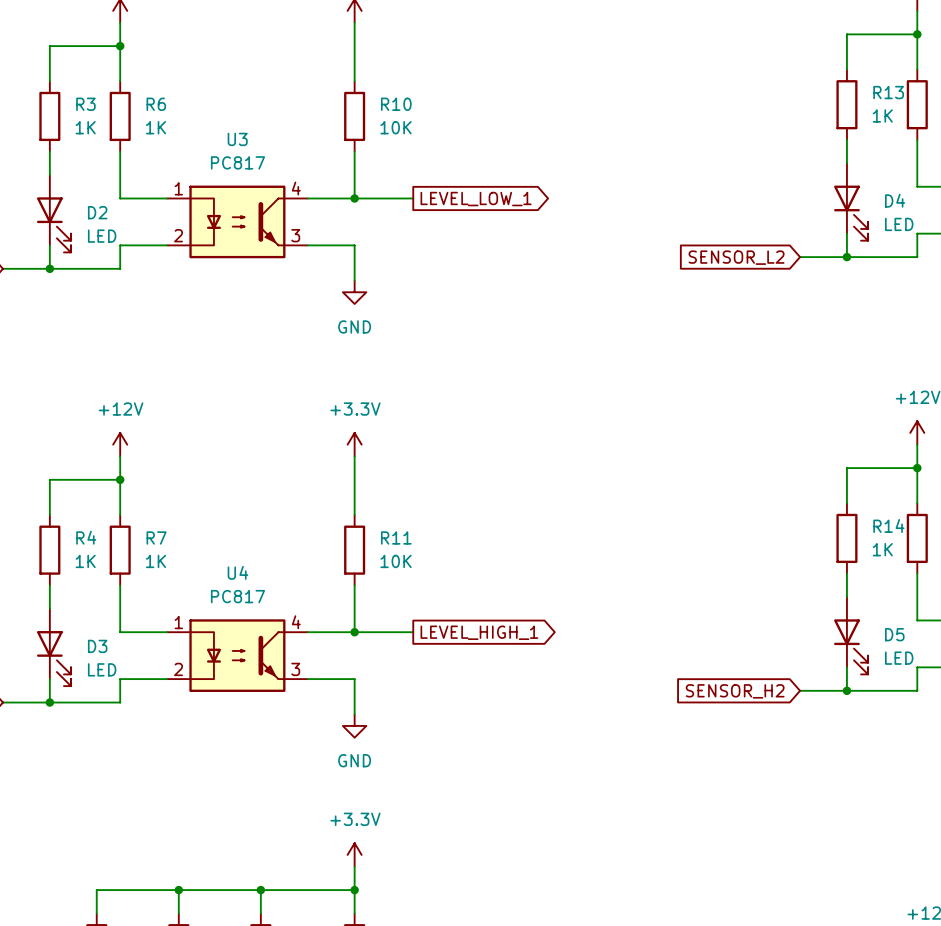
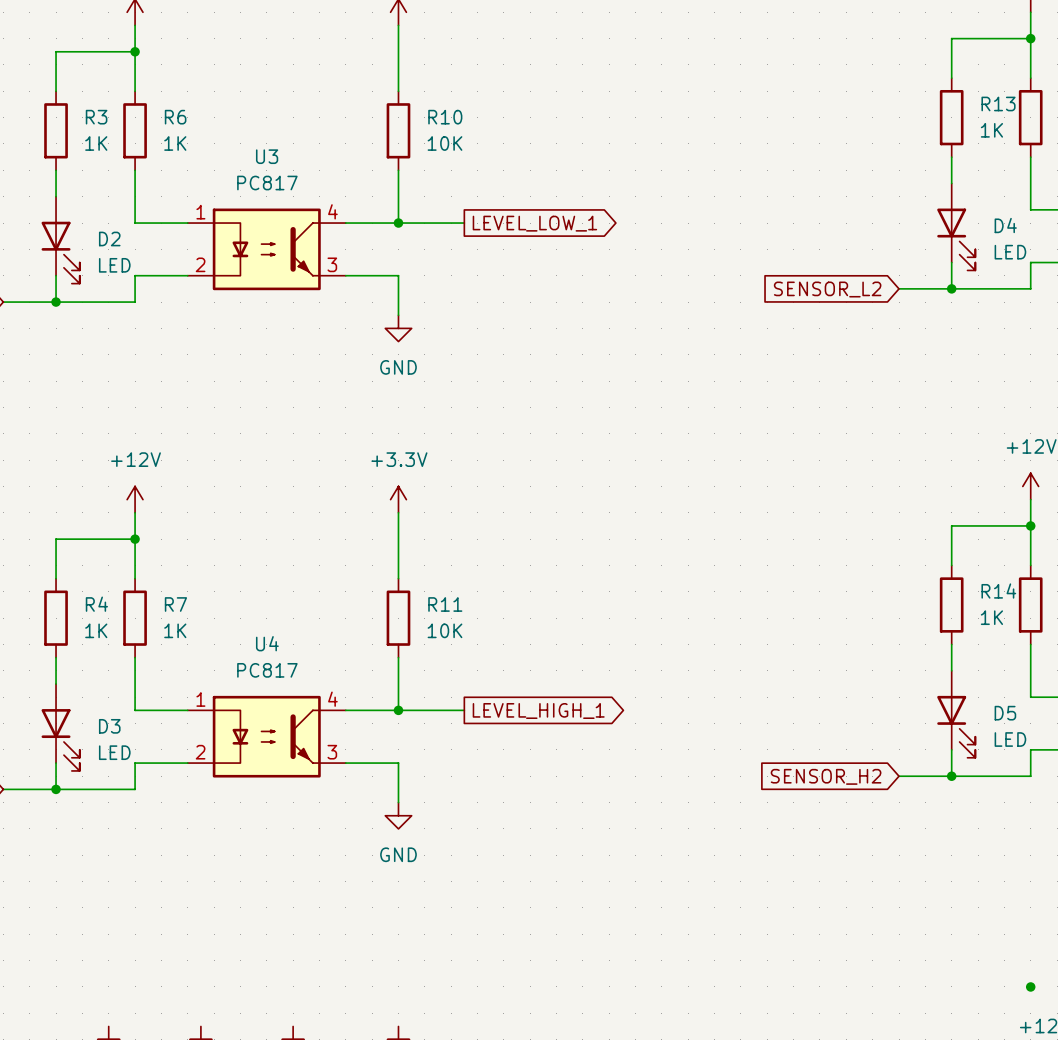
power symbol: +3.3V (354, 854) -> none
wire: (354, 866) (354, 913) -> none
junction: none -> (1030, 986)
wire: (178, 890) (178, 913) -> none
junction: (178, 890) -> none
wire: (260, 890) (260, 913) -> none
junction: (260, 890) -> none
wire: (354, 890) (96, 890) (96, 913) -> none
junction: (354, 890) -> none

